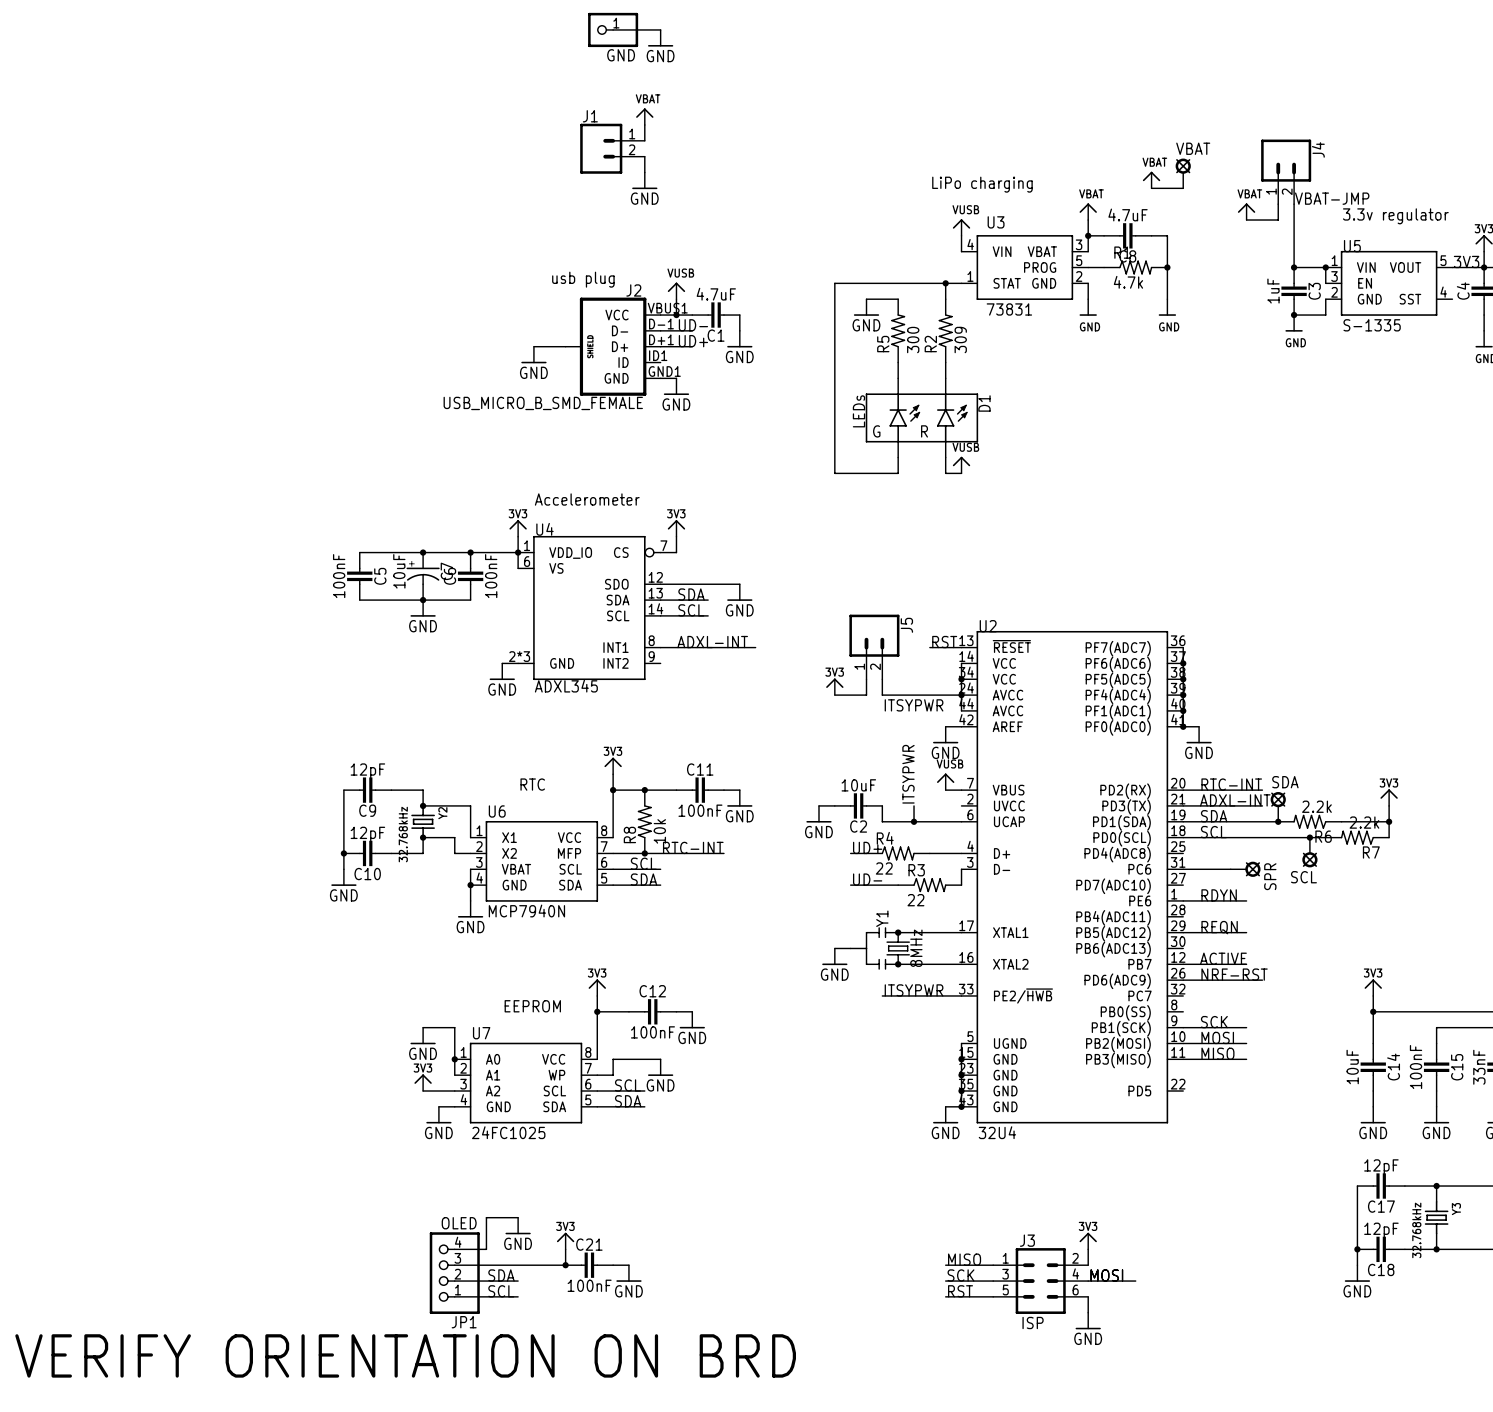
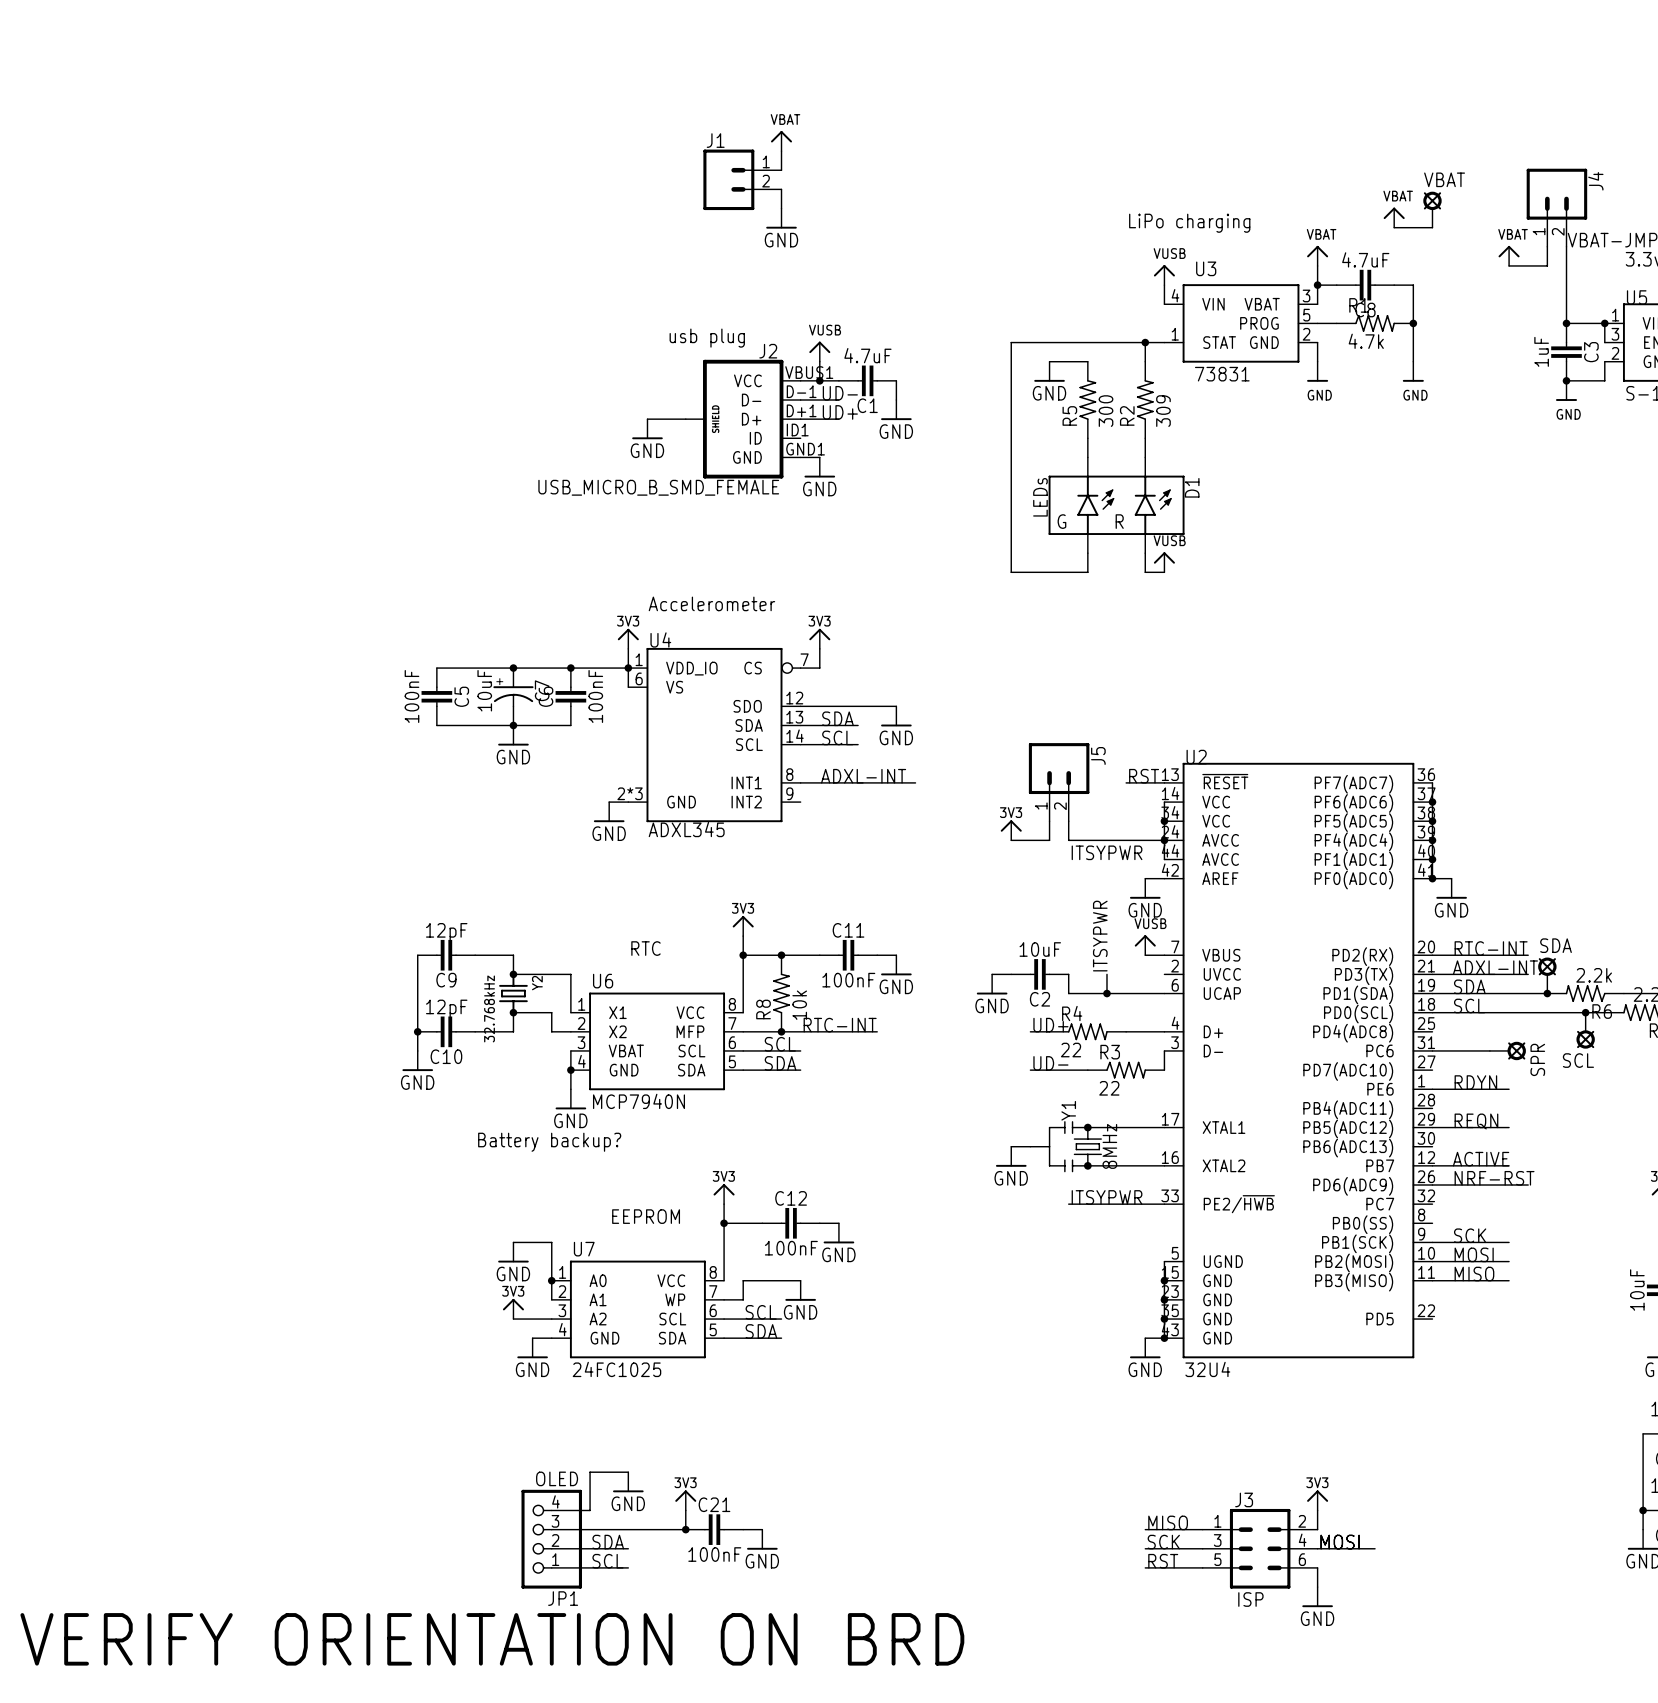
wire: (613, 29) (660, 29) -> none
GND: (613, 29) -> none
power symbol: GND (660, 38) -> none
text: none -> Battery backup? (549, 1142)

